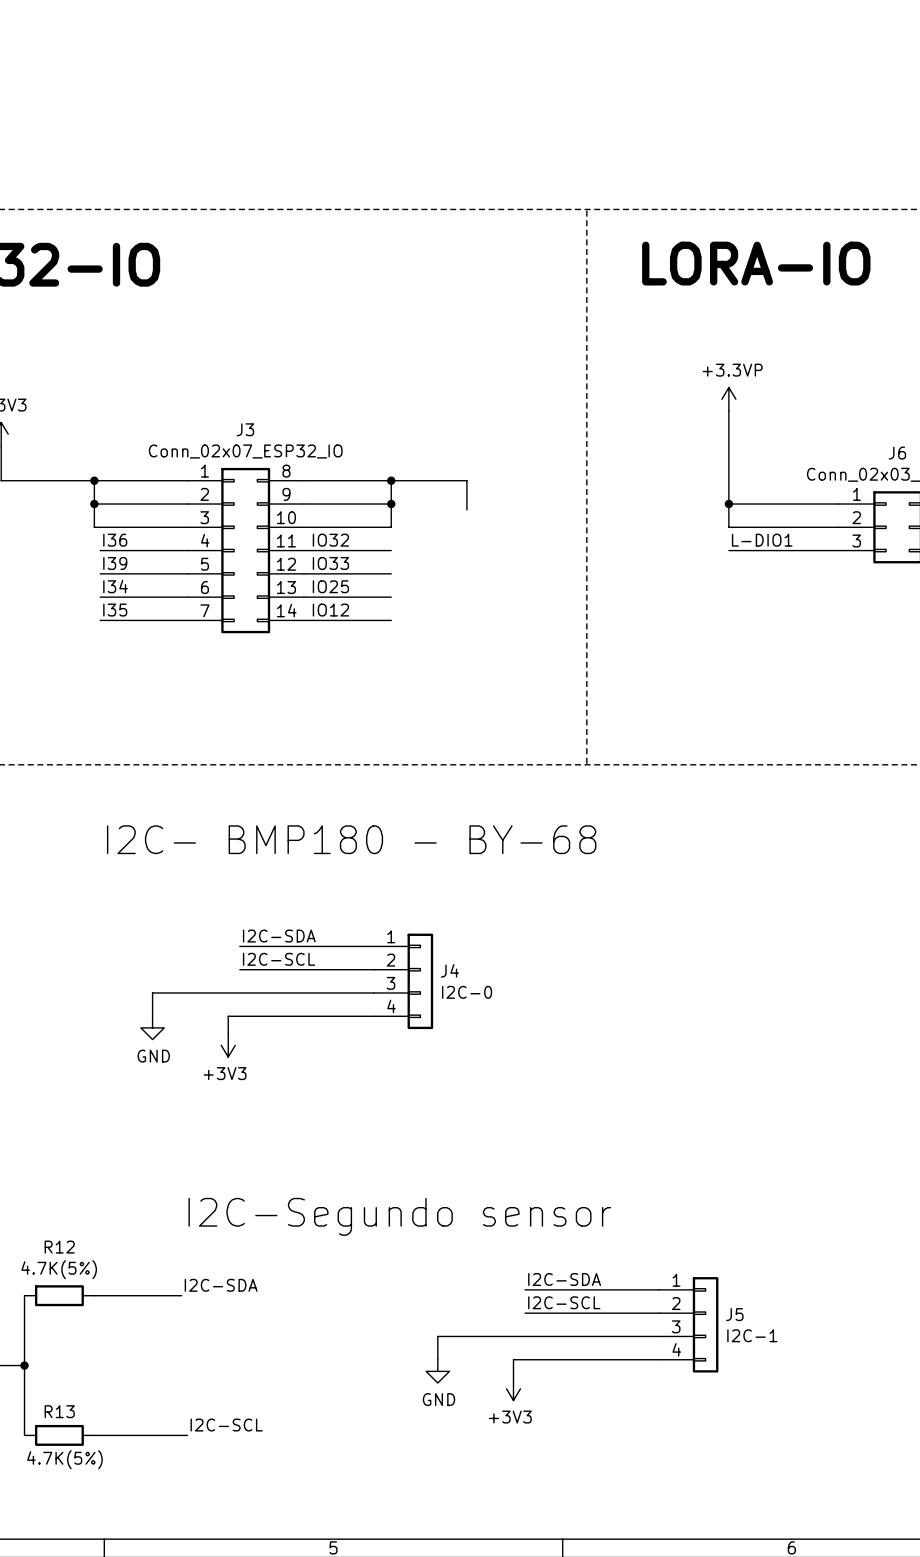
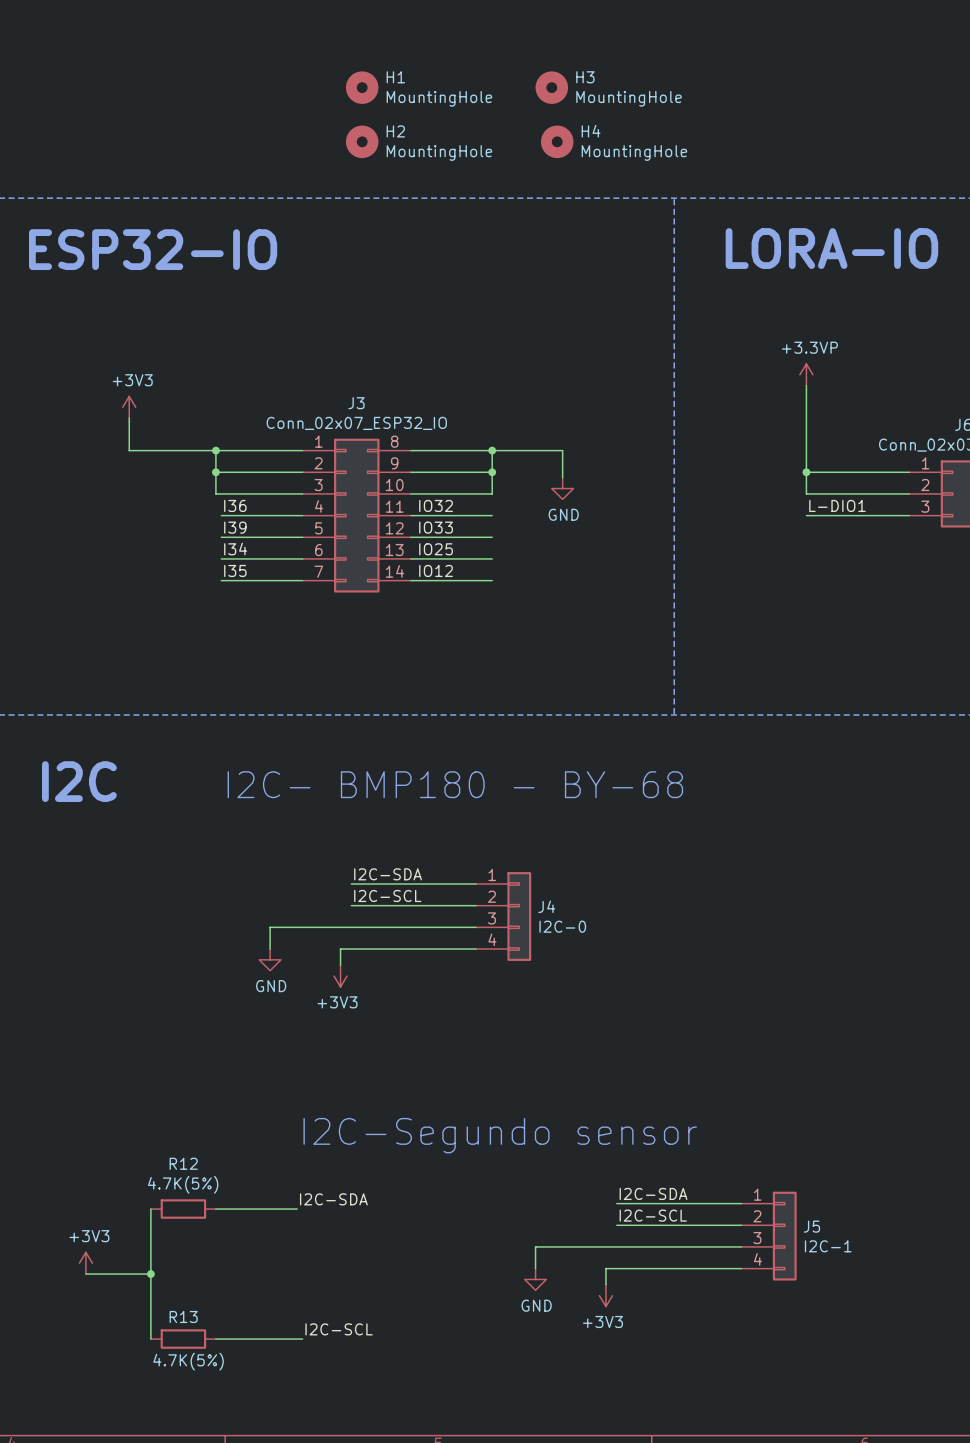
H1: none -> MountingHole (362, 87)
H3: none -> MountingHole (551, 87)
H2: none -> MountingHole (362, 141)
H4: none -> MountingHole (557, 141)
power symbol: none -> GND (562, 488)

